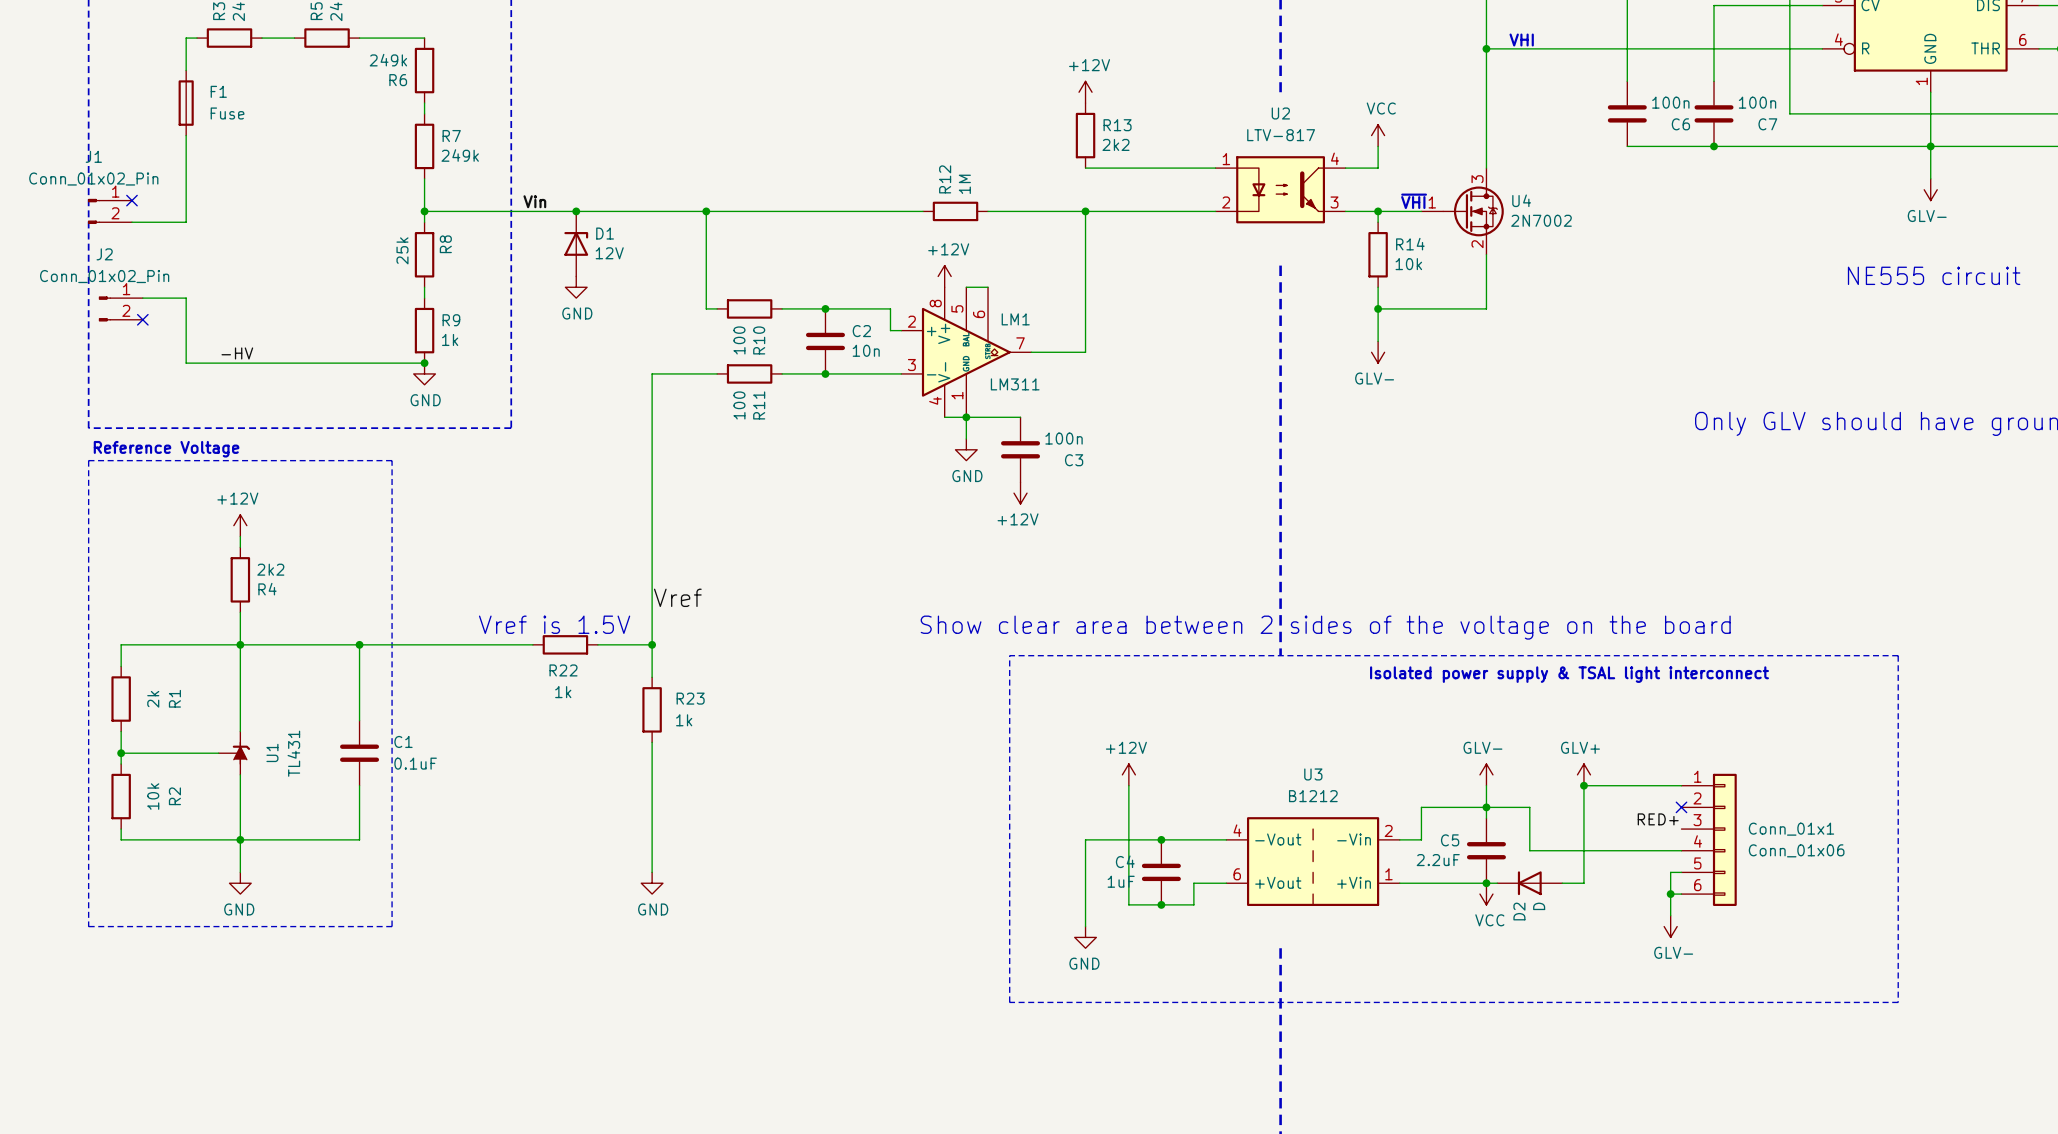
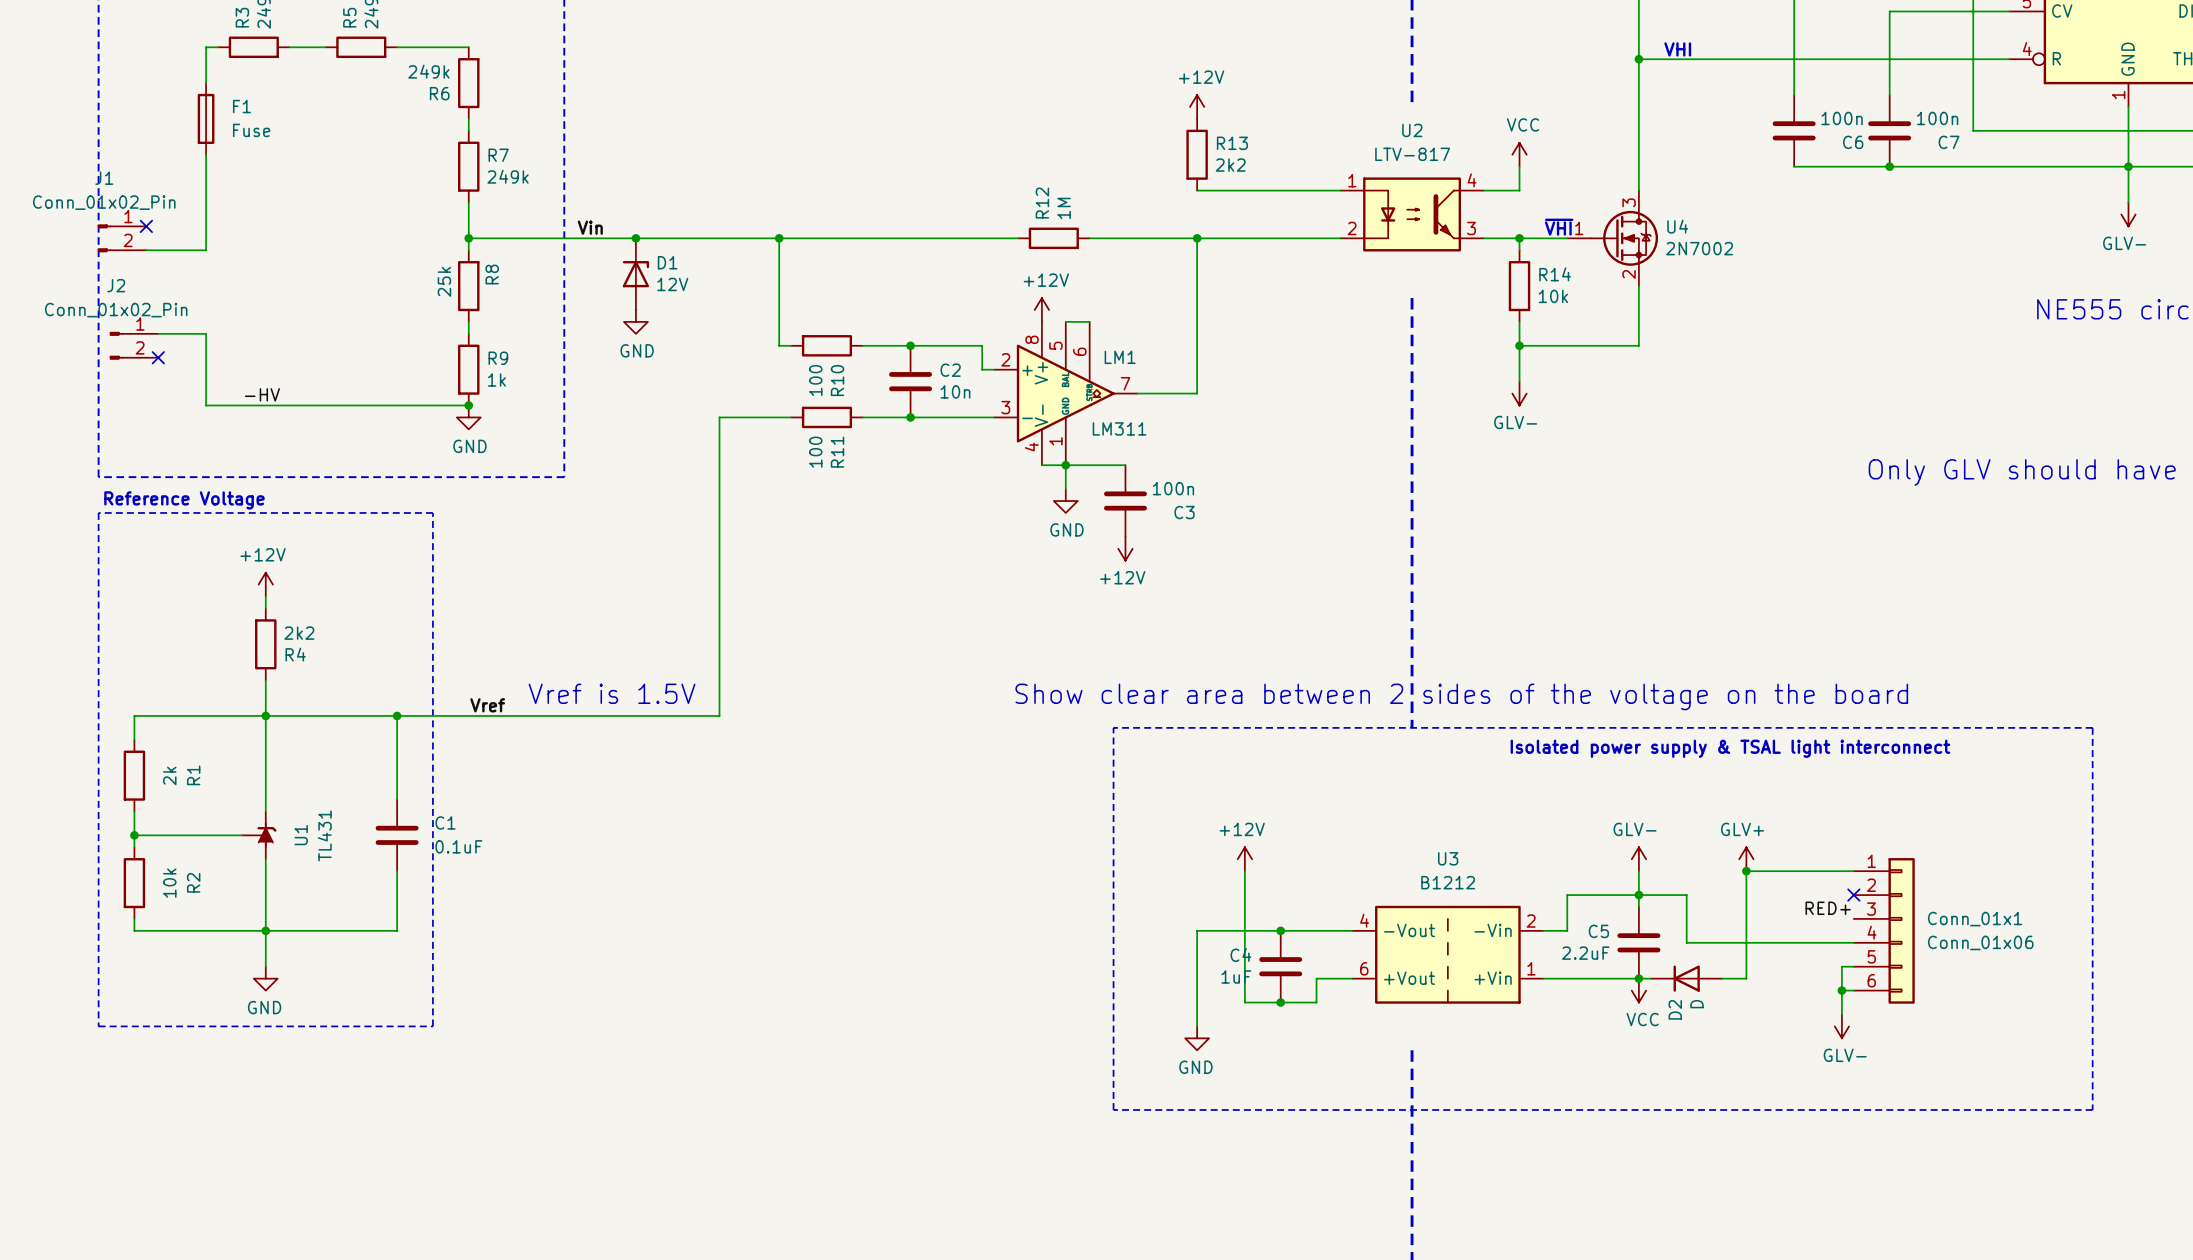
label: Vref (677, 597) -> none
label: none -> Vref (487, 705)
wire: none -> (588, 715) (659, 715)
R22: 1k (565, 644) -> none
wire: (652, 644) (652, 677) -> none
junction: (652, 644) -> none
R23: 1k (652, 709) -> none
wire: (652, 742) (652, 872) -> none
power symbol: GND (652, 883) -> none

